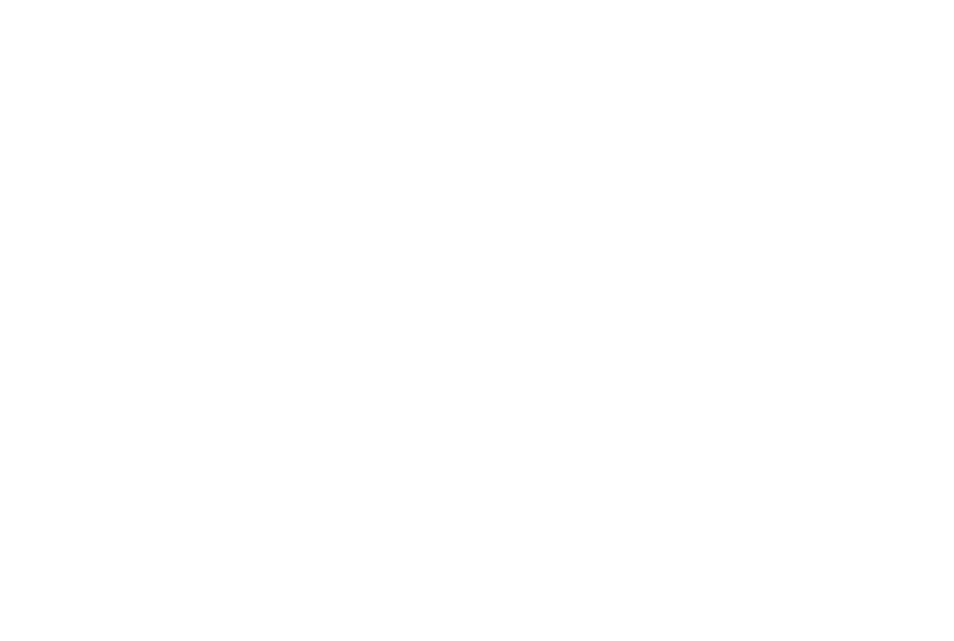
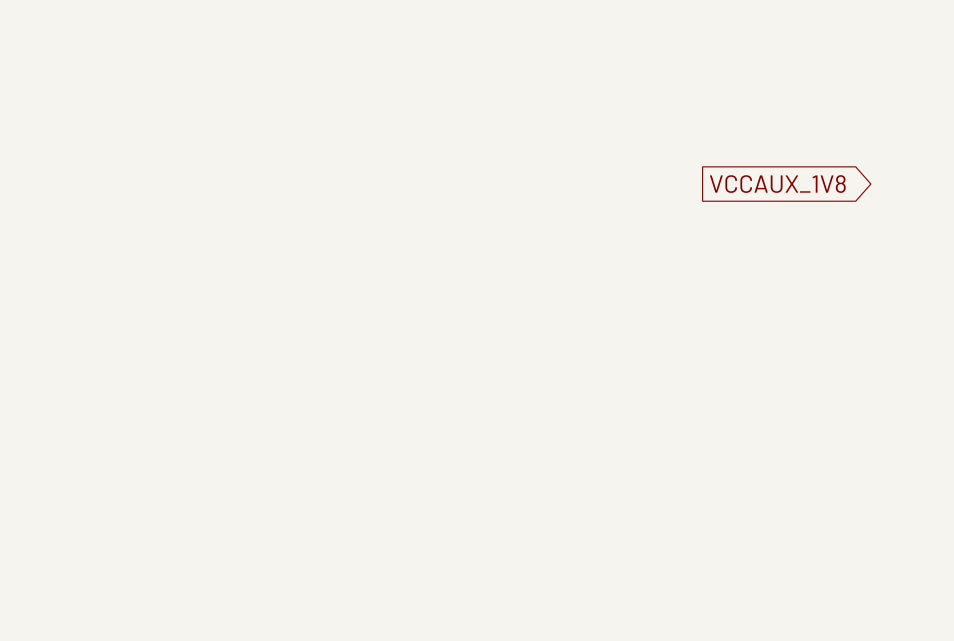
global label: none -> VCCAUX_1V8 (777, 184)

